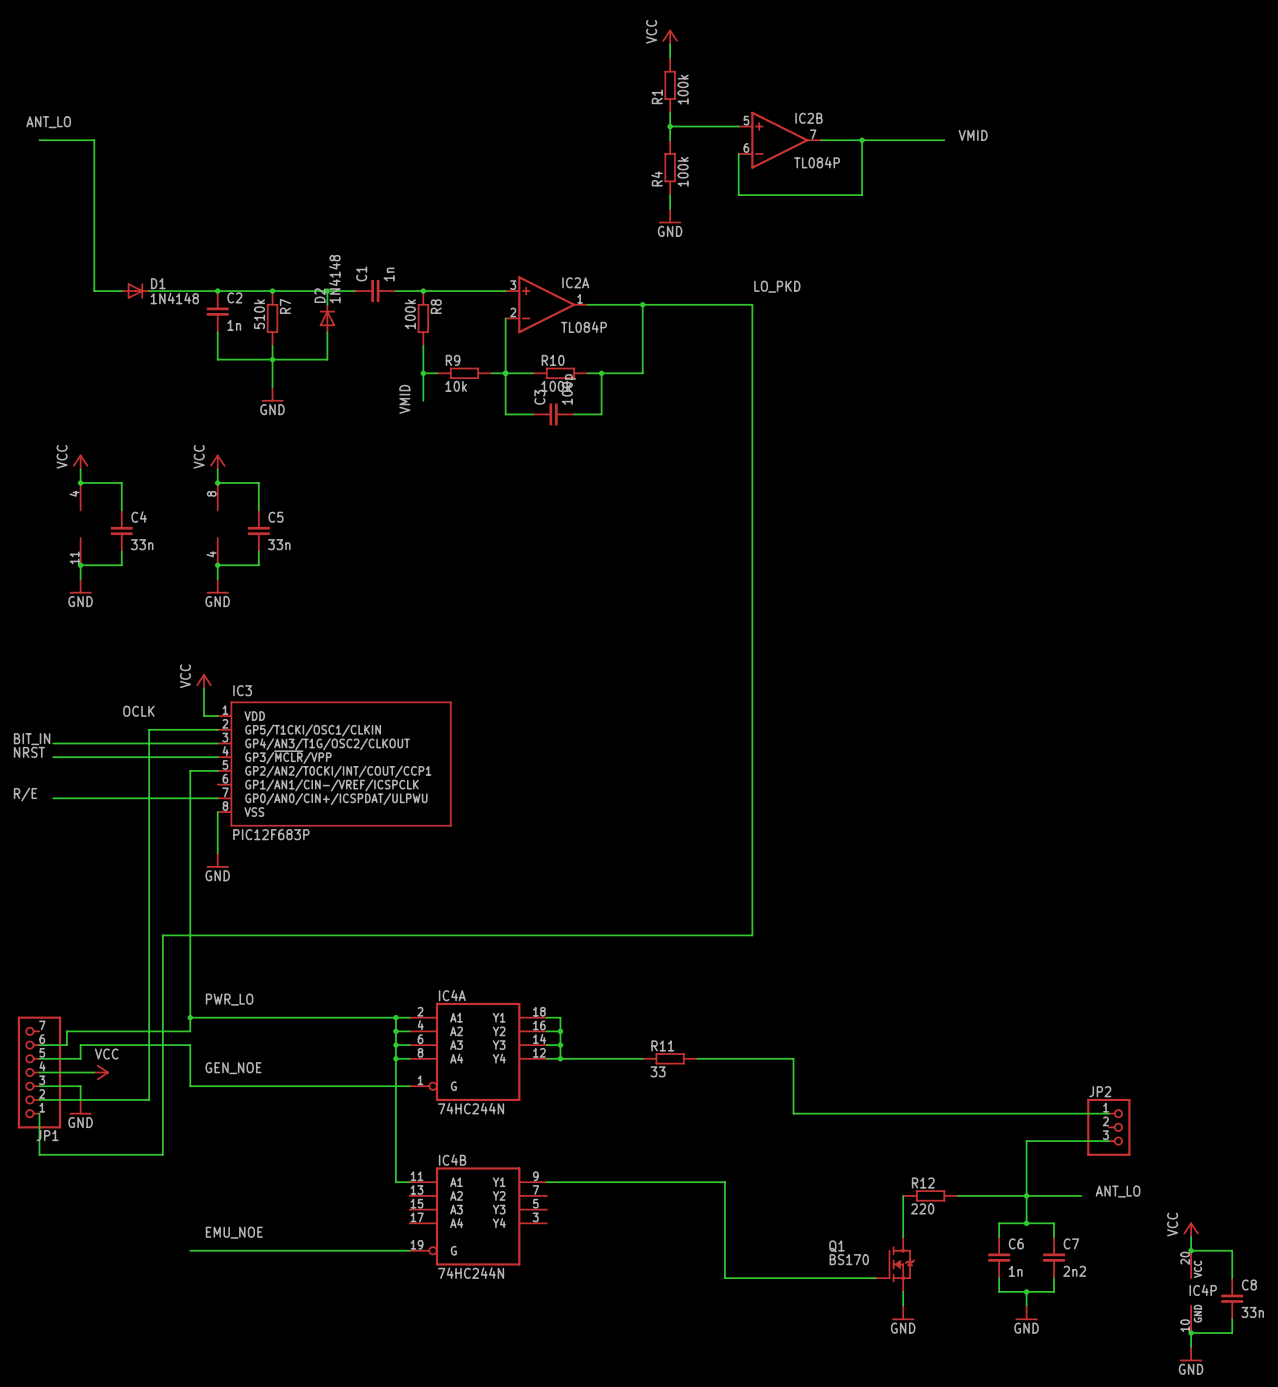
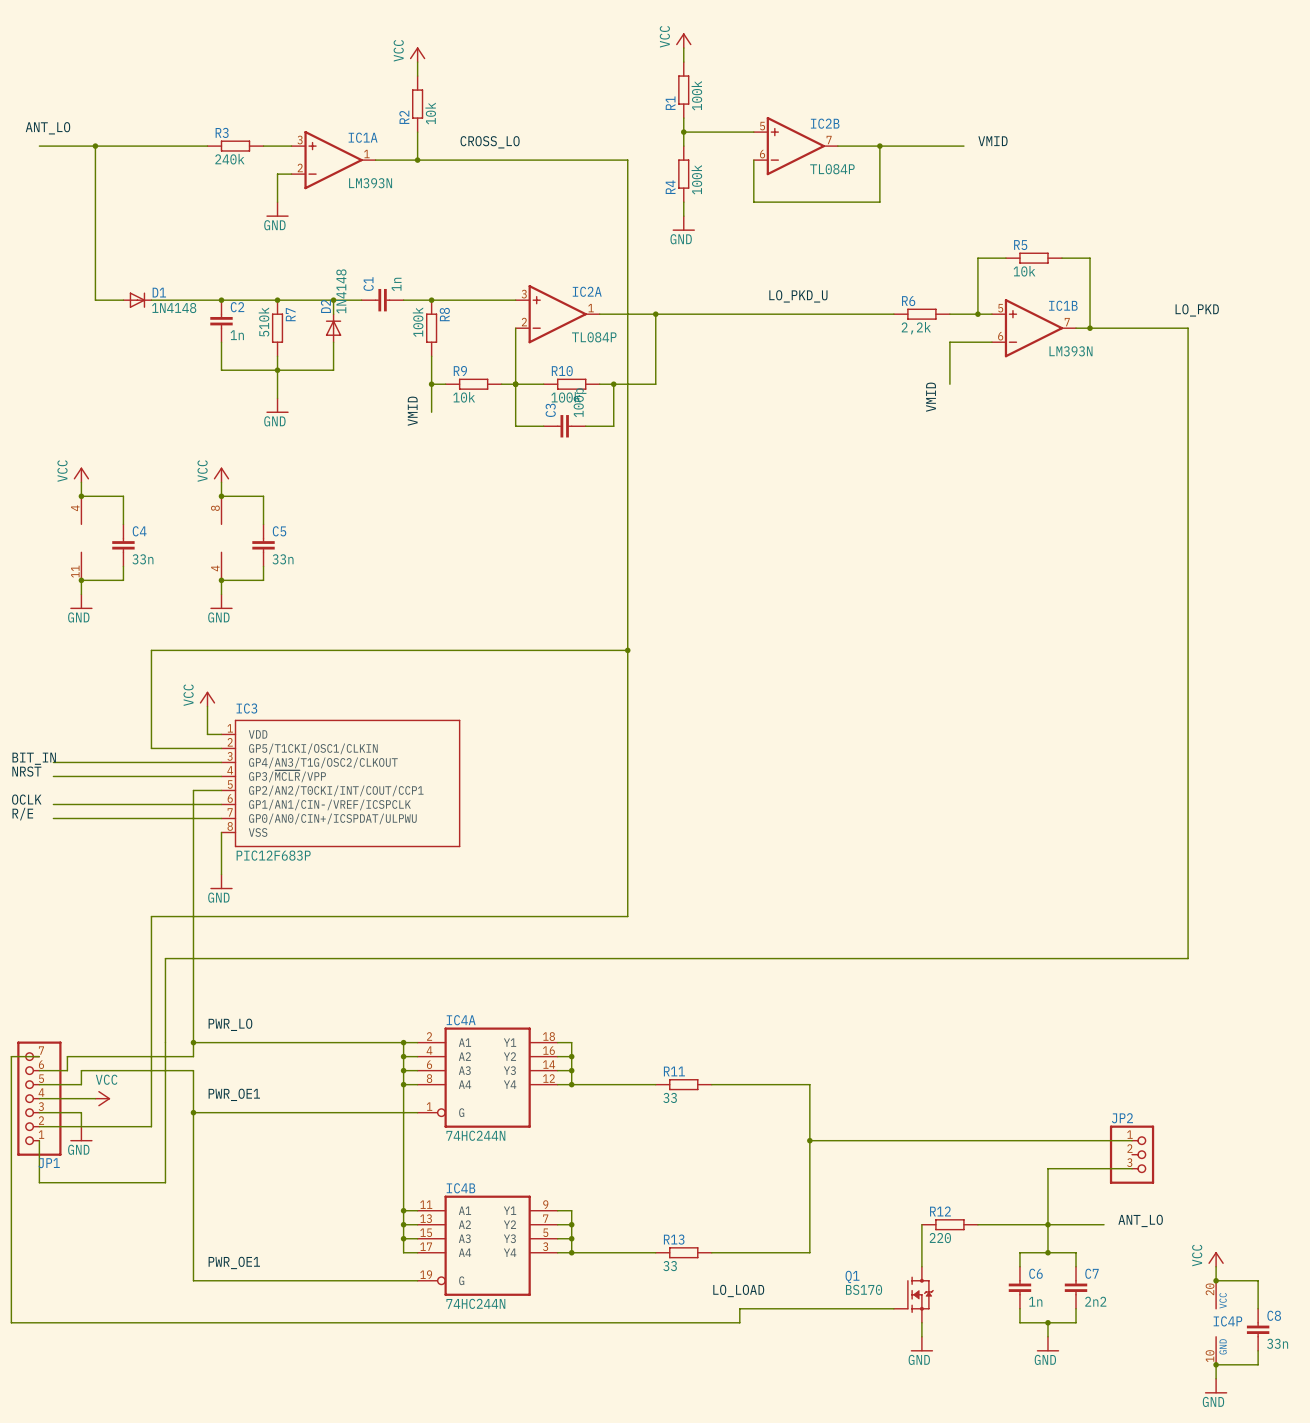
power symbol: none -> VCC (417, 54)
wire: none -> (417, 62) (417, 76)
R2: none -> 10k (417, 104)
wire: none -> (417, 132) (417, 160)
label: none -> CROSS_LO (490, 142)
wire: none -> (95, 146) (207, 146)
junction: none -> (95, 146)
R3: none -> 240k (235, 146)
wire: none -> (263, 146) (291, 146)
IC1A: none -> LM393N (333, 160)
wire: none -> (375, 160) (627, 160) (627, 916) (151, 916)
junction: none -> (417, 160)
wire: none -> (291, 174) (277, 174) (277, 202)
power symbol: none -> GND (277, 209)
wire: none -> (1005, 258) (977, 258) (977, 314)
R5: none -> 10k (1033, 258)
wire: none -> (1061, 258) (1090, 258) (1090, 328)
label: LO_PKD (777, 286) -> LO_PKD_U (798, 296)
label: none -> LO_PKD (1197, 310)
wire: (752, 304) (752, 935) -> (1076, 328) (1188, 328) (1188, 958) (767, 958)
wire: none -> (767, 314) (893, 314)
R6: none -> 2,2k (921, 314)
wire: none -> (949, 314) (991, 314)
junction: none -> (977, 314)
IC1B: none -> LM393N (1033, 328)
junction: none -> (1090, 328)
wire: none -> (991, 342) (949, 342) (949, 384)
label: none -> VMID (931, 397)
junction: none -> (627, 650)
label position: OCLK (138, 711) -> OCLK (26, 799)
wire: (149, 729) (149, 894) -> (151, 748) (151, 650) (627, 650)
wire: none -> (53, 804) (221, 804)
wire: none -> (39, 1056) (11, 1056) (11, 1322) (739, 1322) (739, 1308)
label: GEN_NOE (233, 1068) -> PWR_OE1 (234, 1094)
wire: none -> (193, 1112) (193, 1280)
junction: none -> (193, 1112)
wire: none -> (809, 1140) (809, 1252) (711, 1252)
junction: none -> (809, 1140)
wire: none -> (403, 1210) (403, 1252) (417, 1252)
junction: none -> (403, 1210)
wire: (560, 1182) (724, 1182) (724, 1278) -> (571, 1210) (571, 1252)
wire: none -> (403, 1224) (417, 1224)
junction: none -> (403, 1224)
wire: none -> (557, 1224) (571, 1224)
junction: none -> (571, 1224)
wire: none -> (403, 1238) (417, 1238)
junction: none -> (403, 1238)
wire: none -> (557, 1238) (571, 1238)
junction: none -> (571, 1238)
wire: none -> (557, 1252) (655, 1252)
junction: none -> (571, 1252)
R13: none -> 33 (683, 1252)
label: EMU_NOE (234, 1232) -> PWR_OE1 (234, 1262)
label: none -> LO_LOAD (738, 1290)

